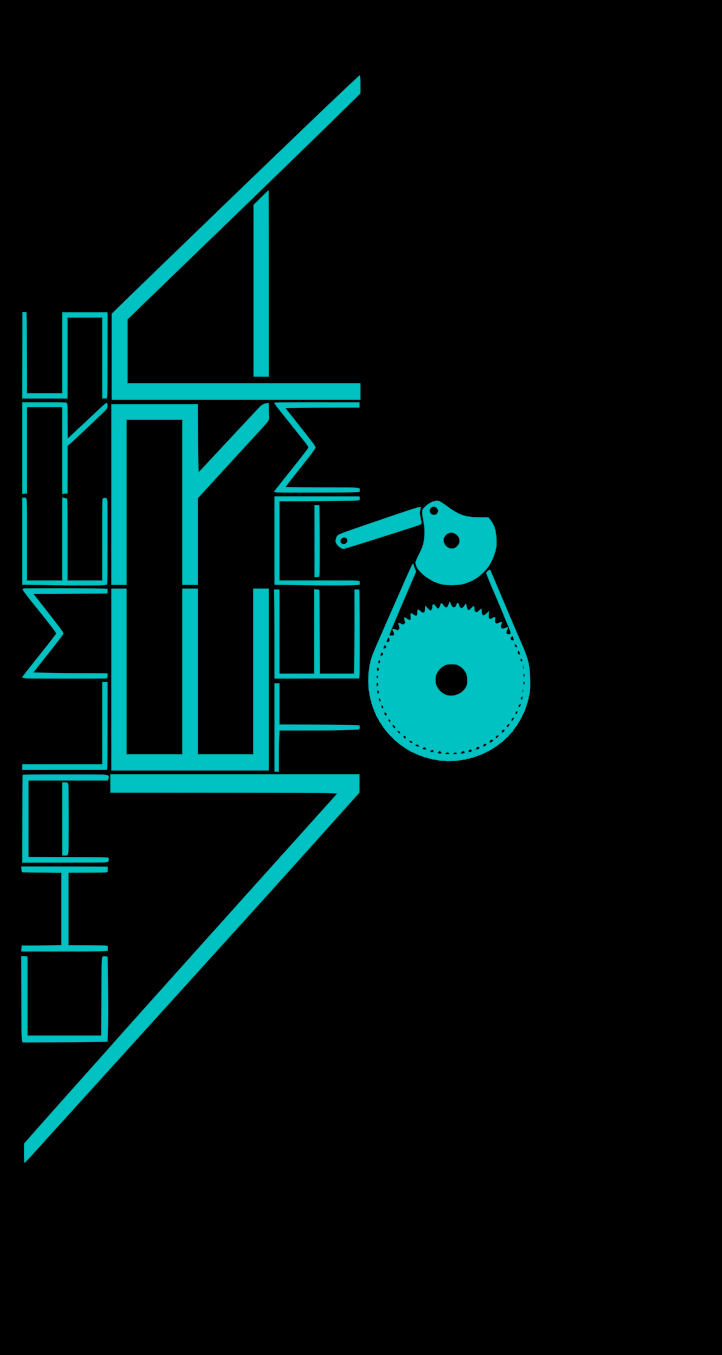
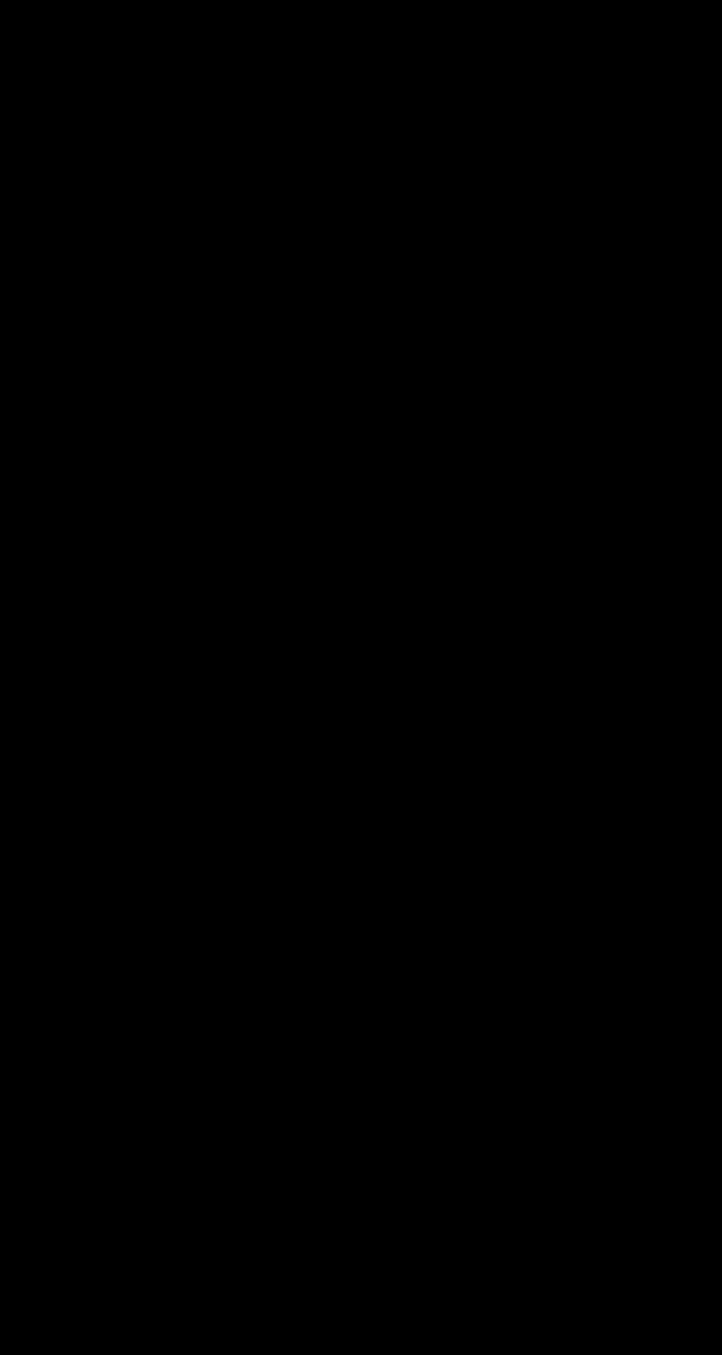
drawing: [21, 75, 531, 1163] -> none

